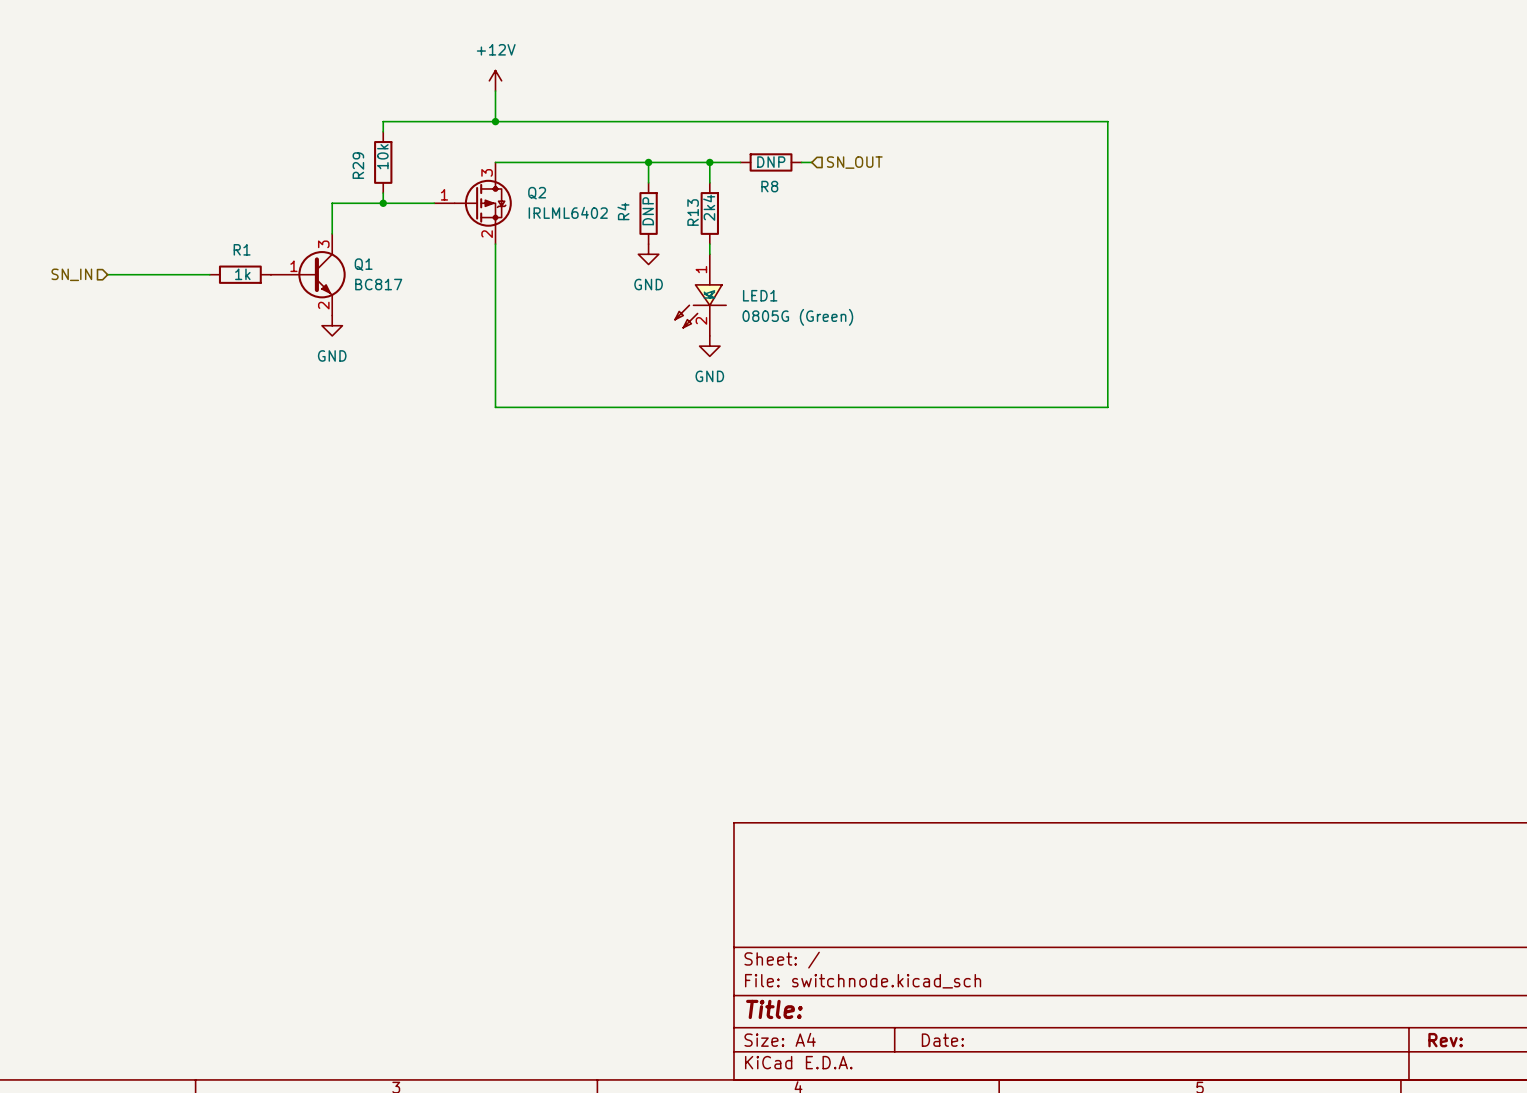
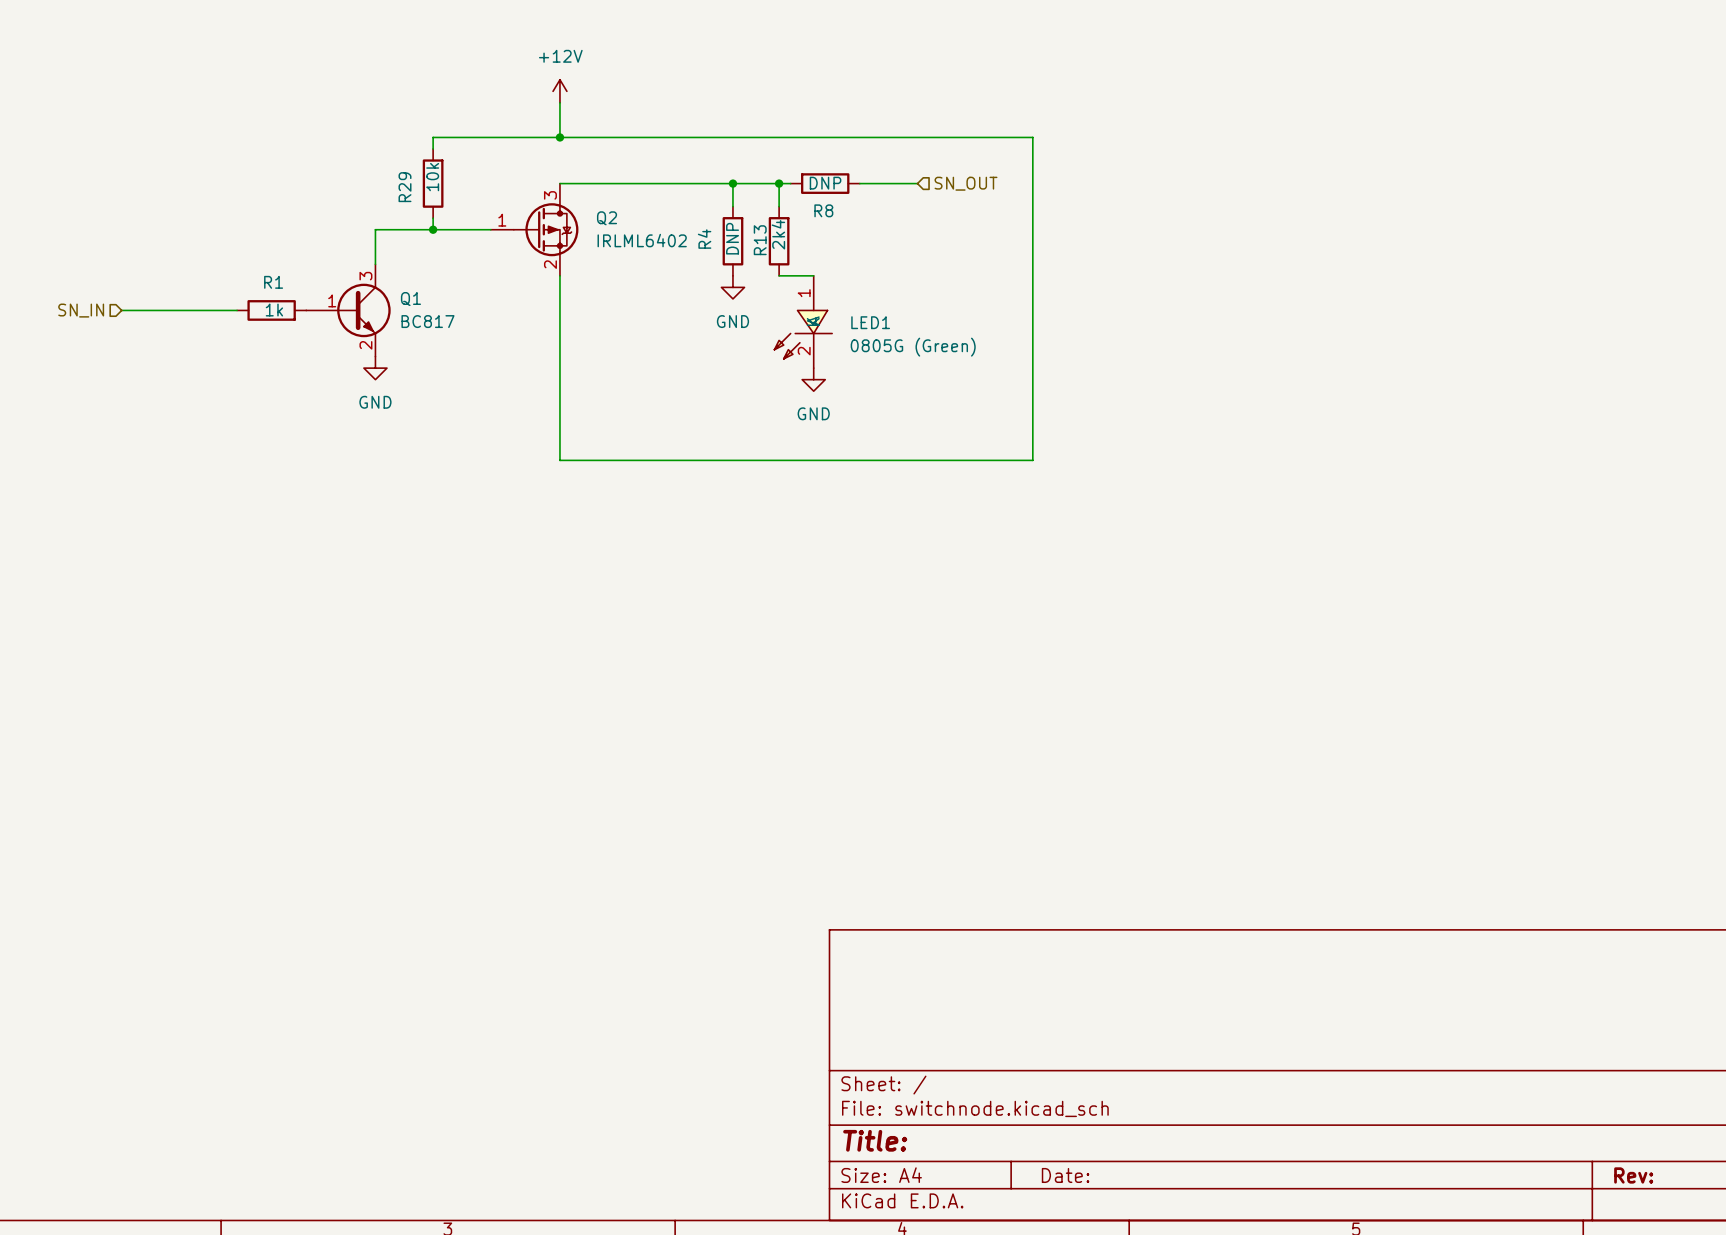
wire: (913, 121) (1107, 121) (1107, 407) (913, 407) -> (1032, 137) (1032, 460)
wire: (709, 162) (709, 182) -> (779, 183) (779, 206)
junction position: (709, 162) -> (779, 183)
R8 position: (771, 162) -> (825, 183)
R13 position: (709, 213) -> (779, 241)
wire: none -> (779, 275) (813, 275)
wire: (709, 244) (709, 254) -> none
LED1 position: (700, 295) -> (803, 321)
power symbol position: GND (709, 346) -> GND (813, 379)

